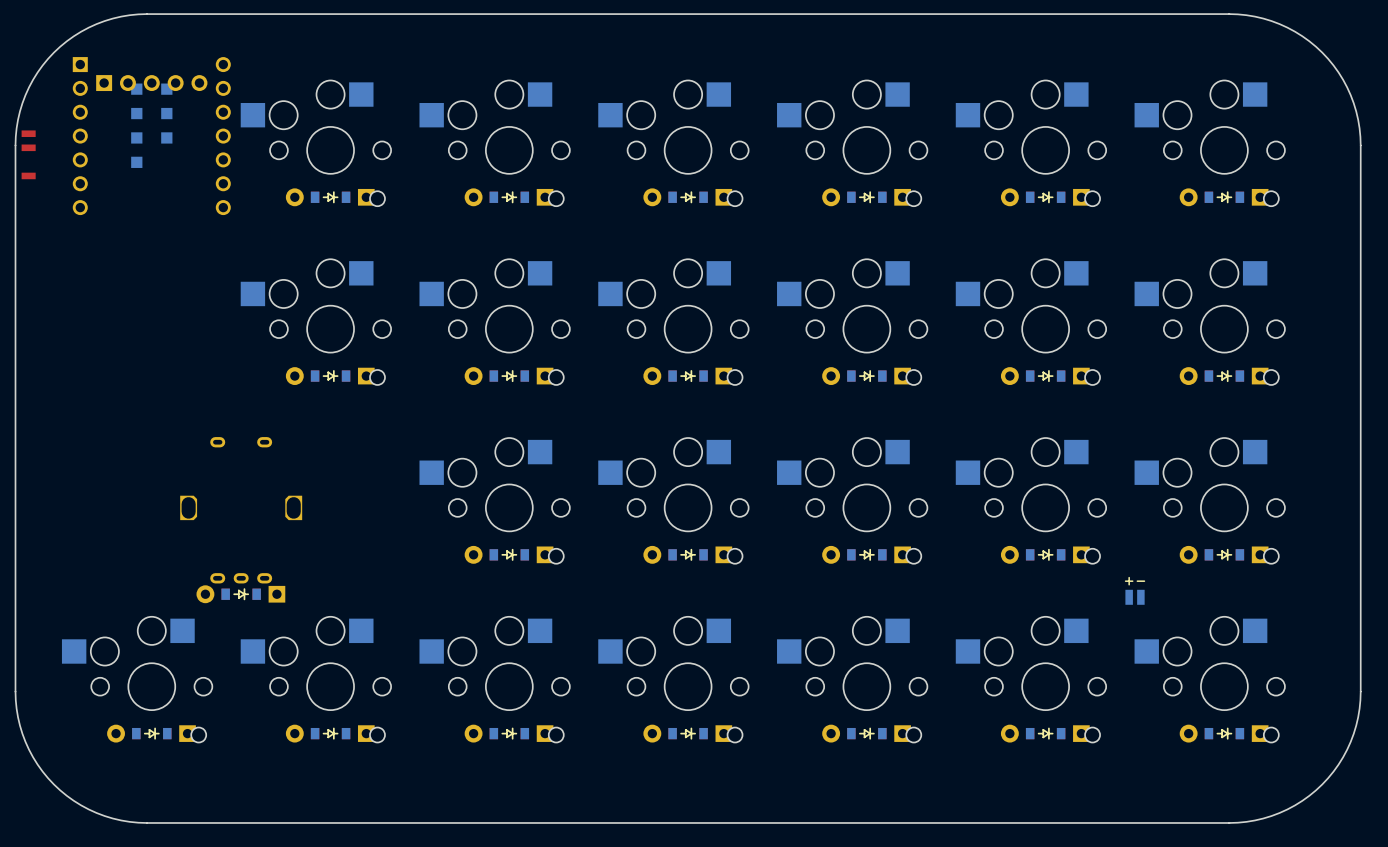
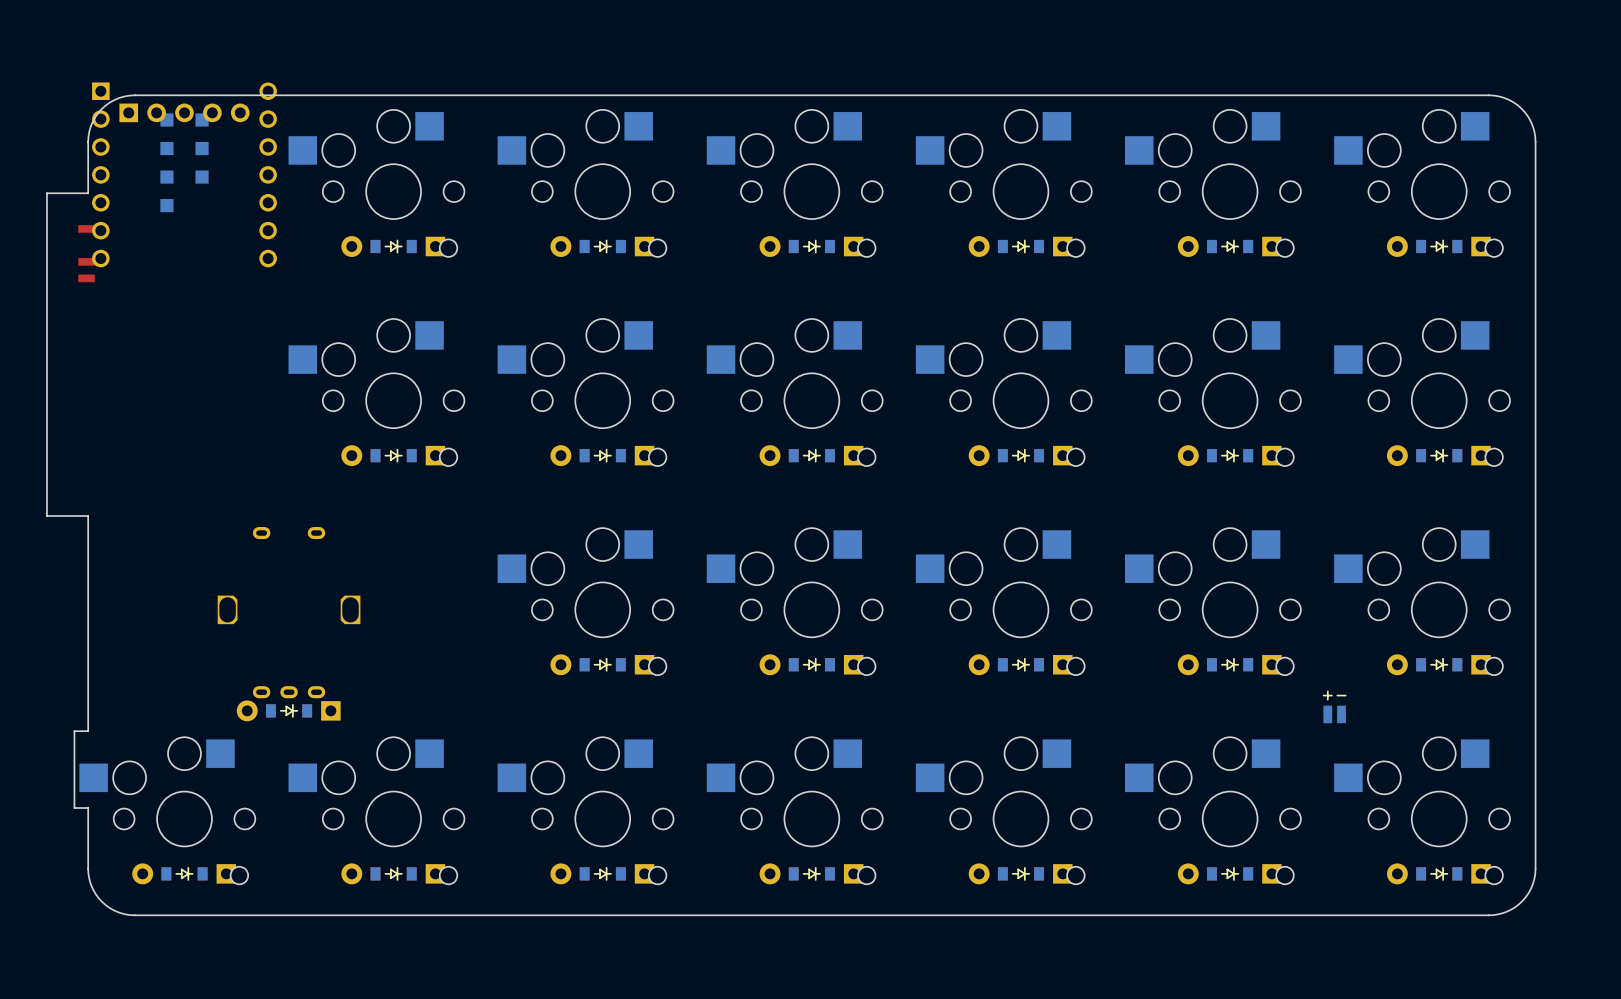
board edge: (1229, 14) (146, 14) (112, 18) (88, 27) (73, 36) (48, 58) (33, 79) (22, 103) (15, 136) (15, 700) (22, 733) (37, 764) (60, 790) (88, 809) (112, 818) (146, 822) (1229, 822) (1263, 818) (1279, 812) (1302, 800) (1322, 784) (1343, 757) (1356, 725) (1360, 700) (1360, 136) (1356, 111) (1347, 87) (1333, 65) (1315, 46) (1302, 36) (1279, 24) (1254, 16) (1229, 14) -> (1488, 95) (1509, 99) (1521, 108) (1532, 126) (1535, 141) (1535, 868) (1530, 888) (1521, 901) (1513, 908) (1504, 912) (1488, 915) (134, 915) (114, 910) (105, 905) (95, 893) (88, 873) (88, 808) (74, 808) (74, 731) (88, 731) (88, 516) (47, 516) (47, 193) (88, 193) (89, 131) (98, 112) (110, 102) (124, 96) (134, 95) (1488, 95)
part rotation: 0° (28, 154) -> 180° (86, 253)
part position: (28, 154) -> (86, 253)

